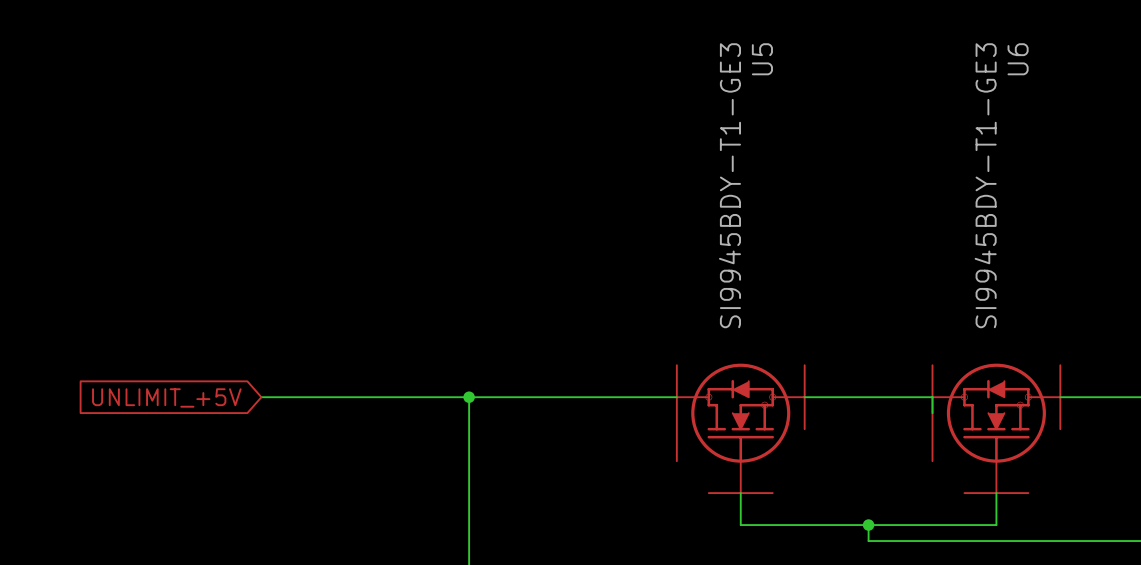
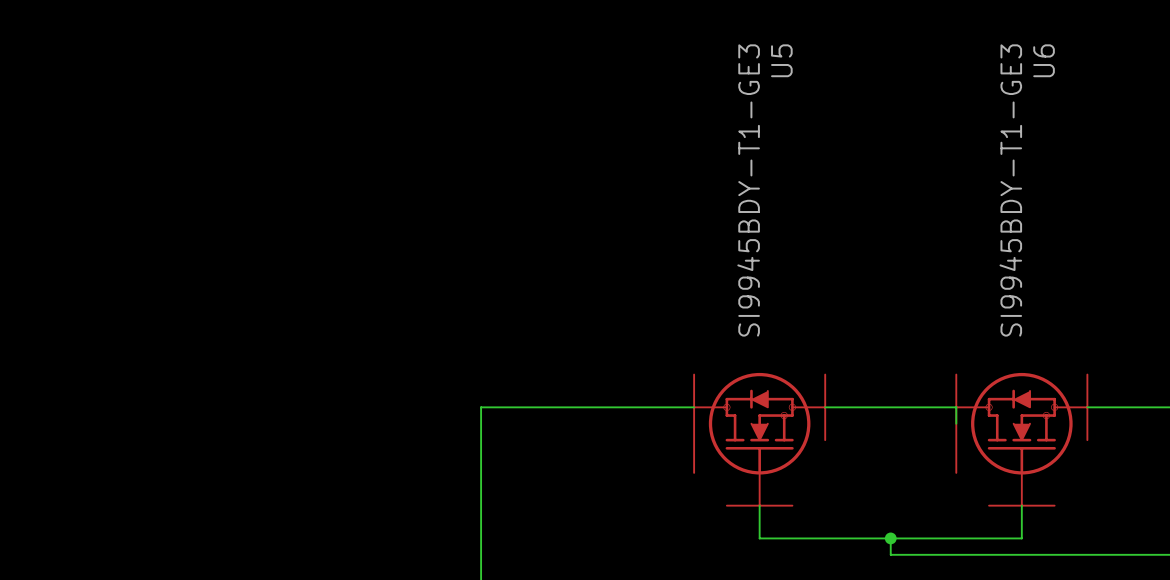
global label: UNLIMIT_+5V (166, 397) -> none
wire: (261, 397) (469, 397) -> none
junction: (469, 397) -> none

